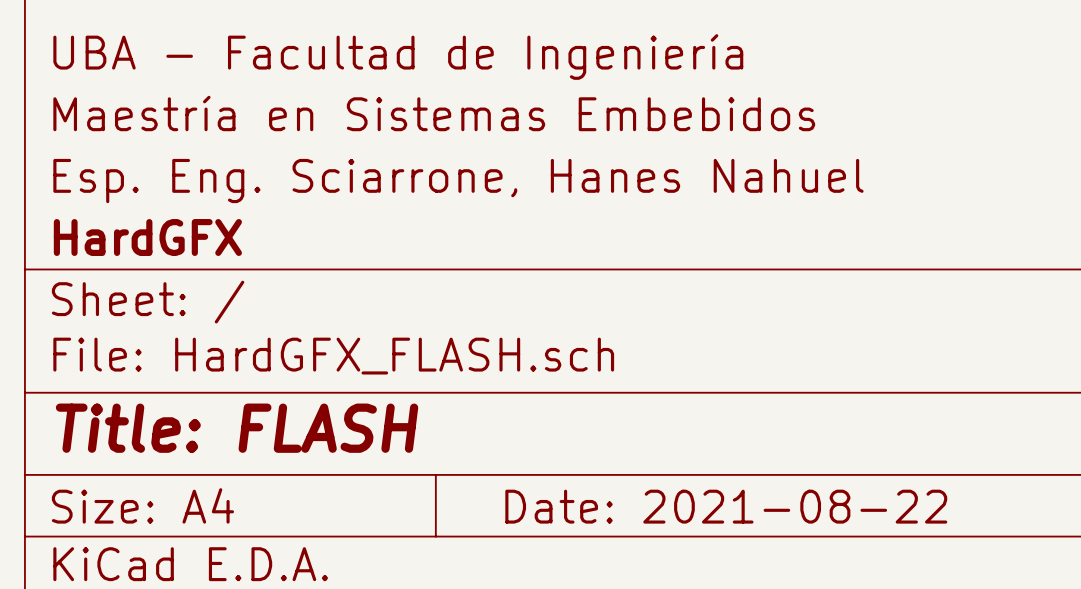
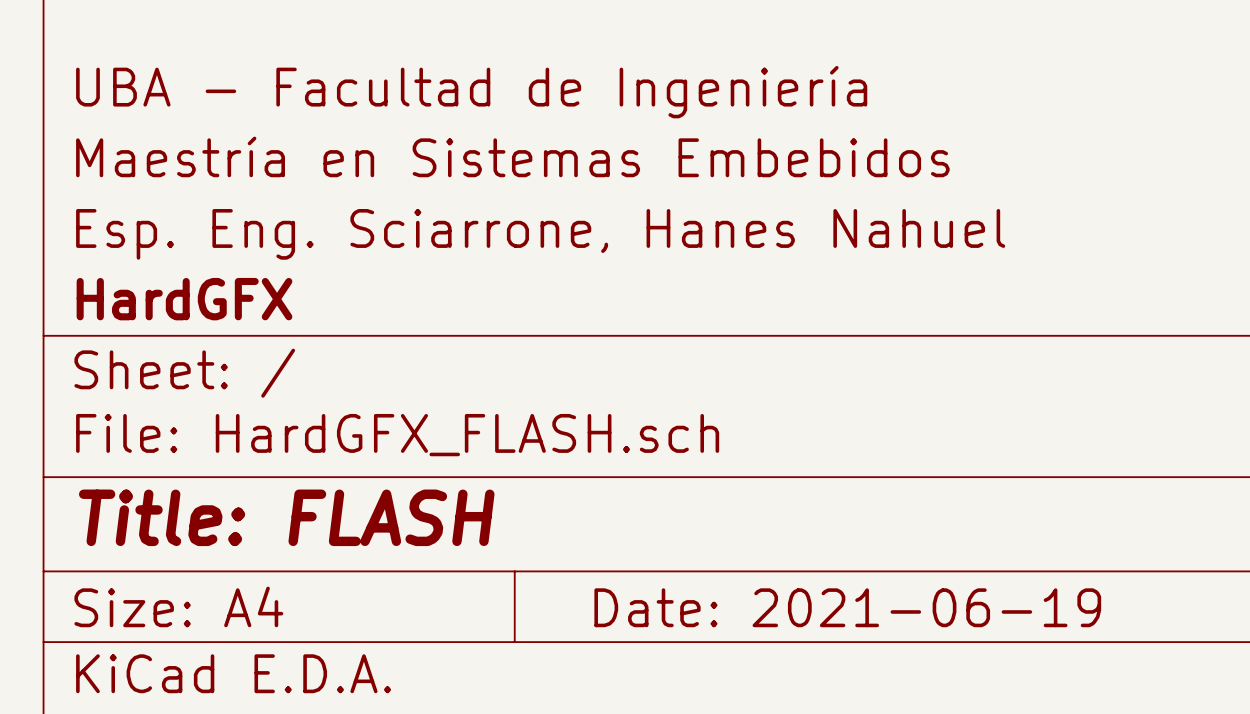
title block: Date: 2021-08-22 (726, 506) -> Date: 2021-06-19 (847, 607)

